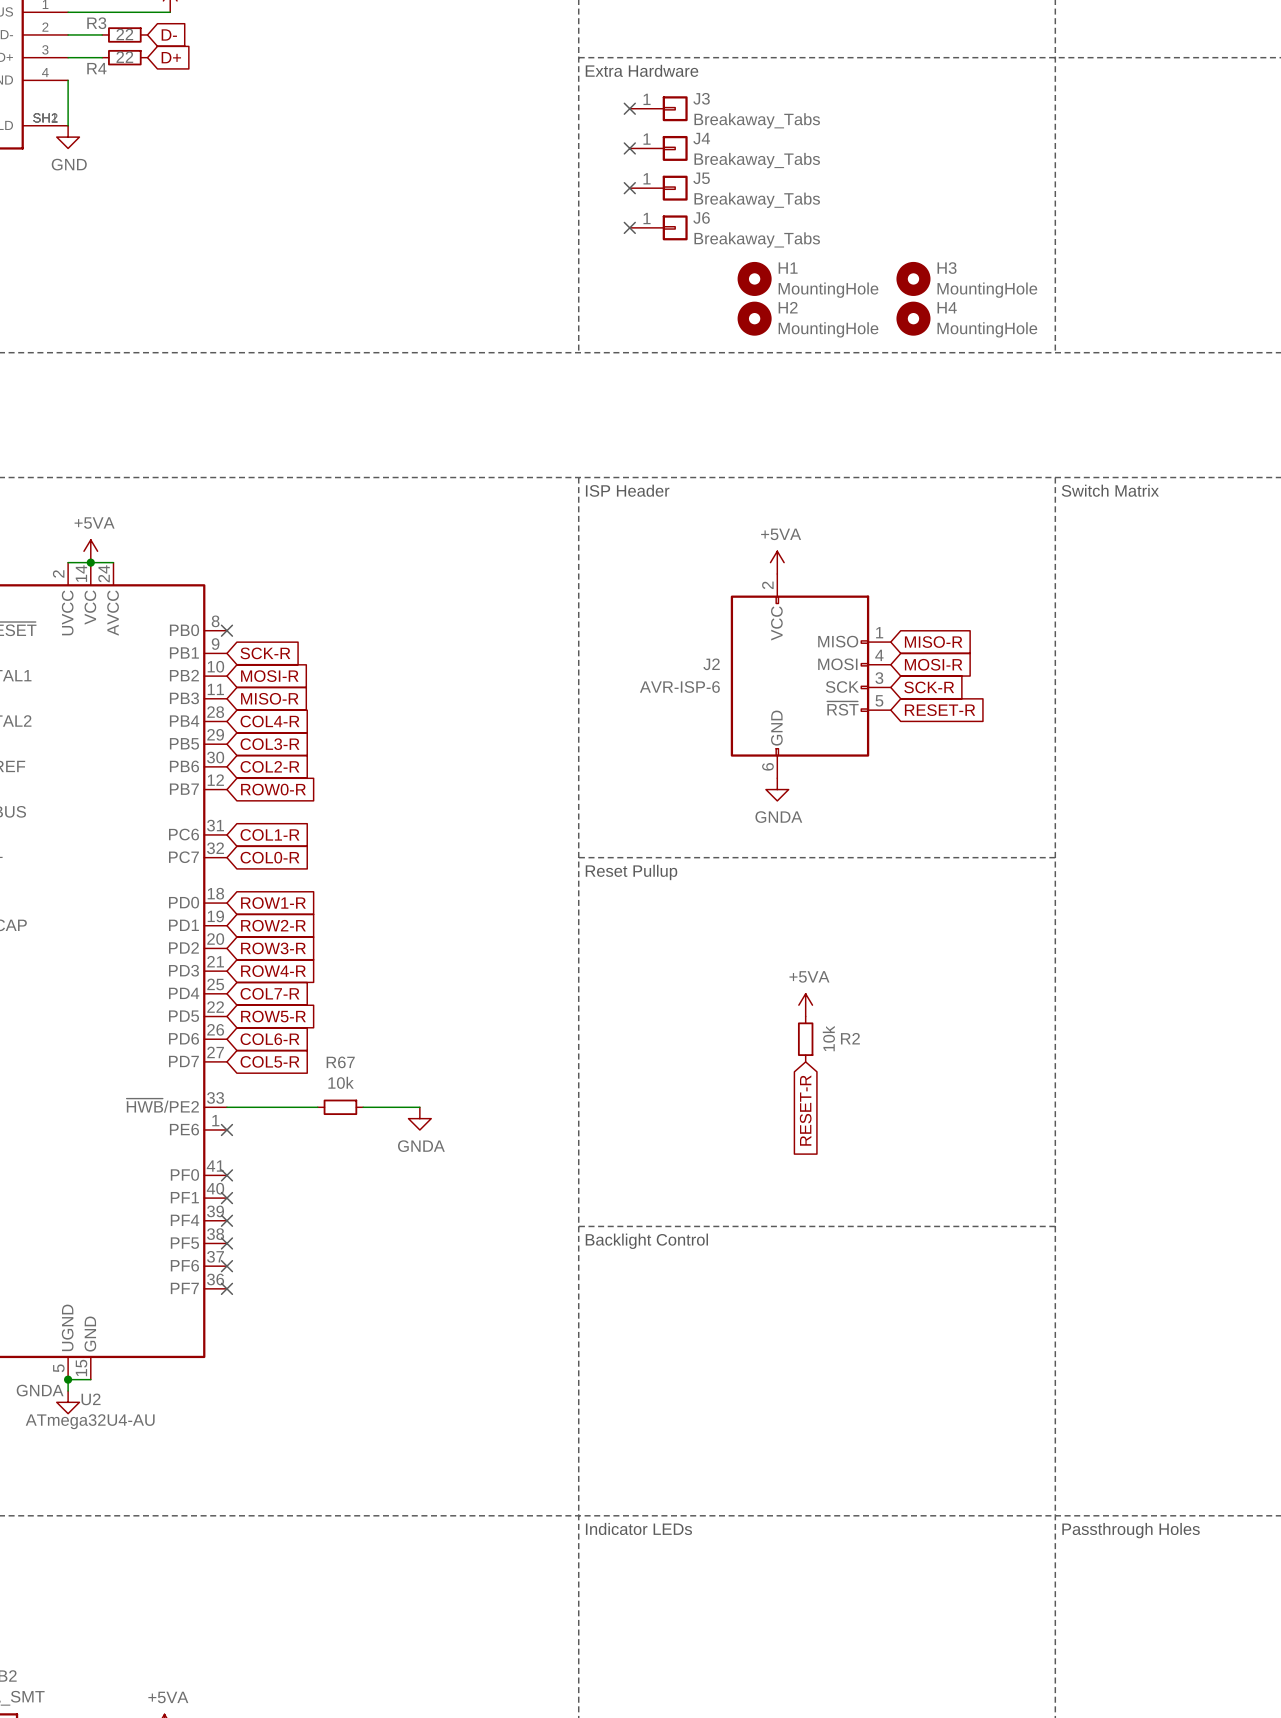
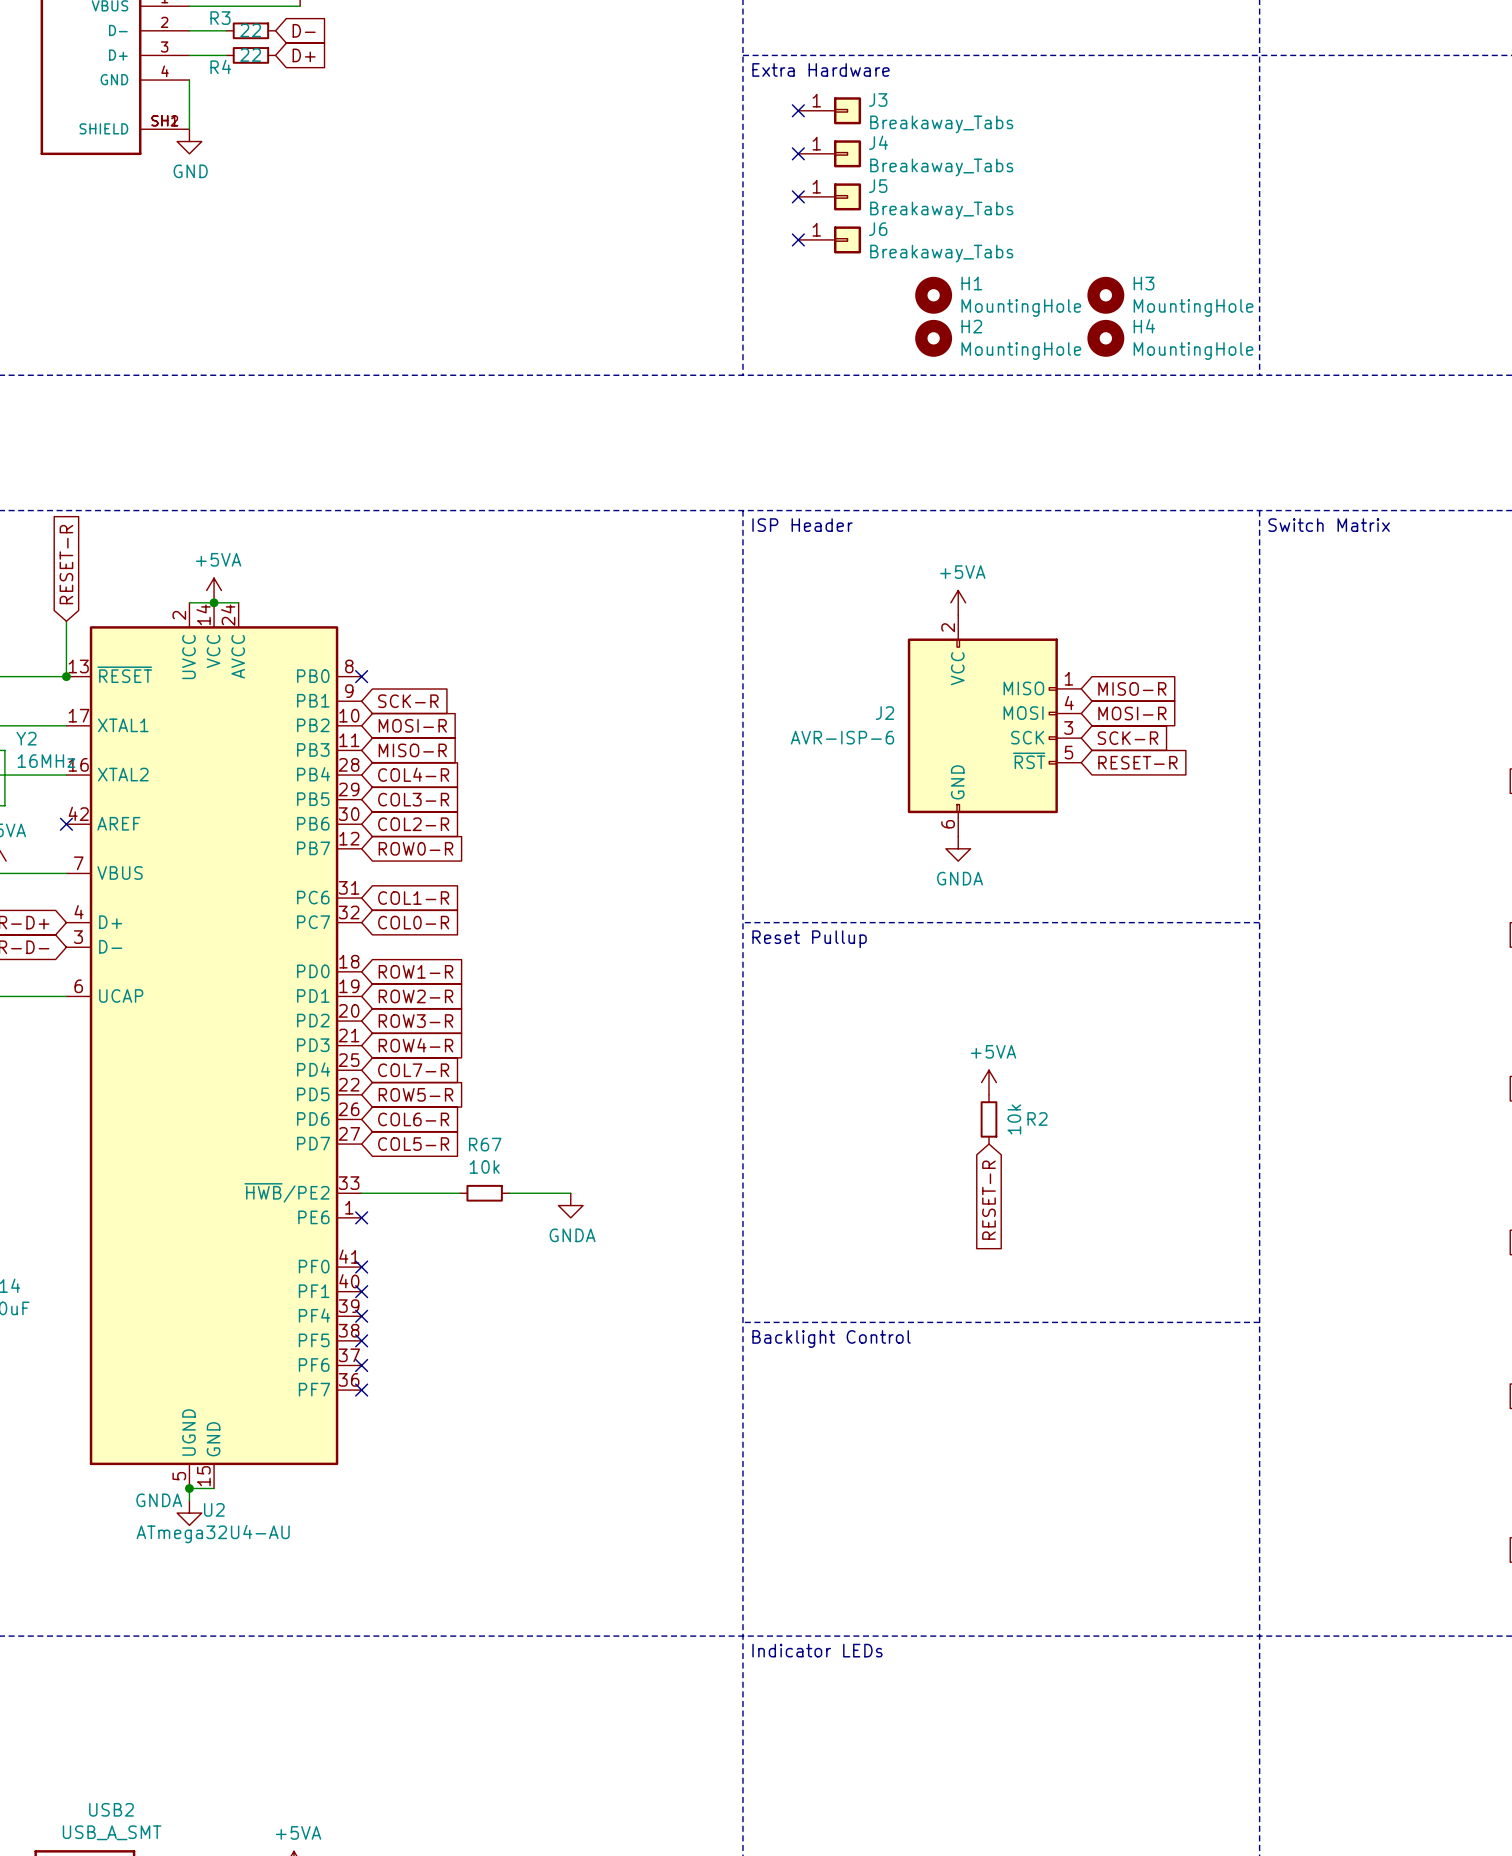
text: Passthrough Holes (1131, 1530) -> none

